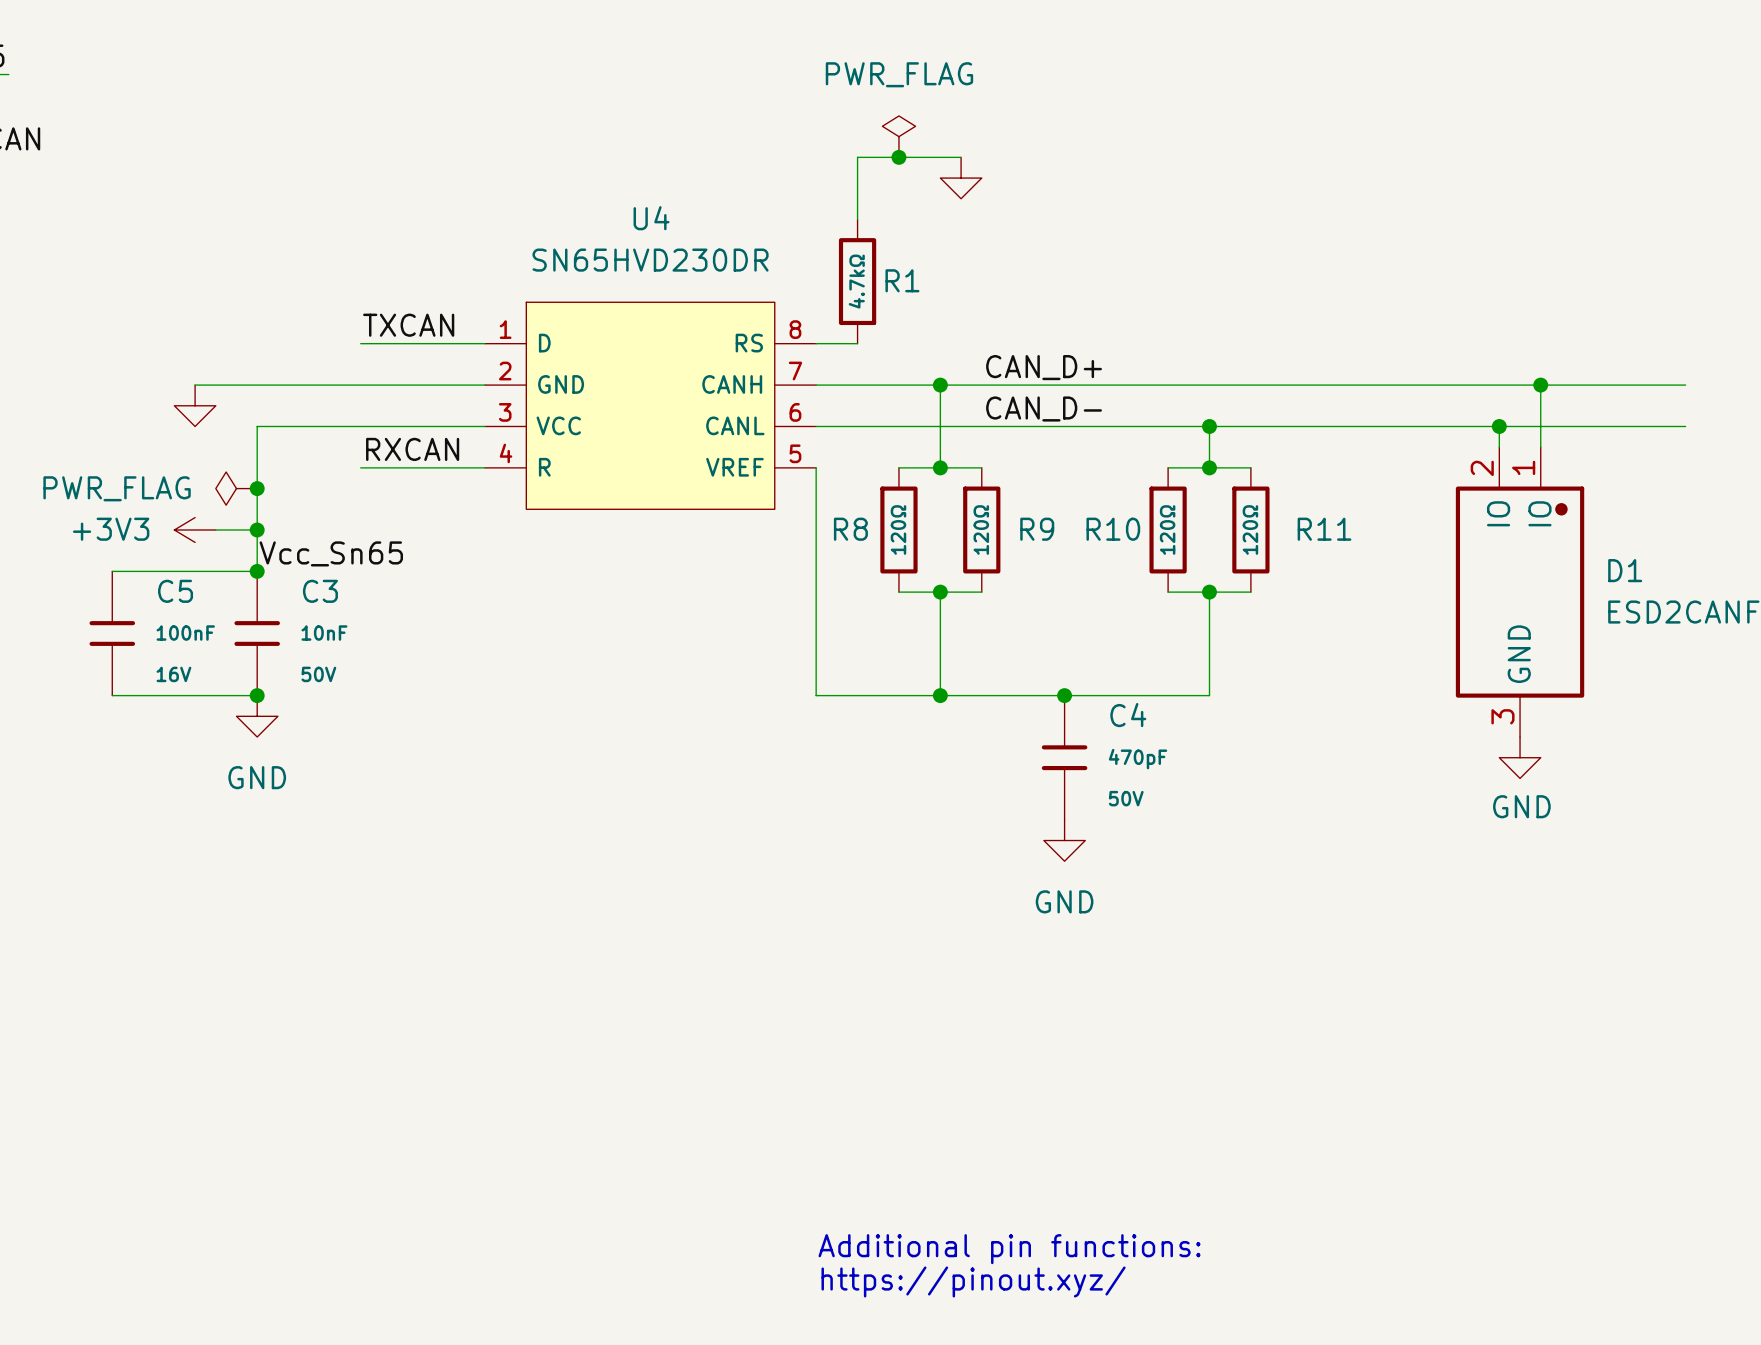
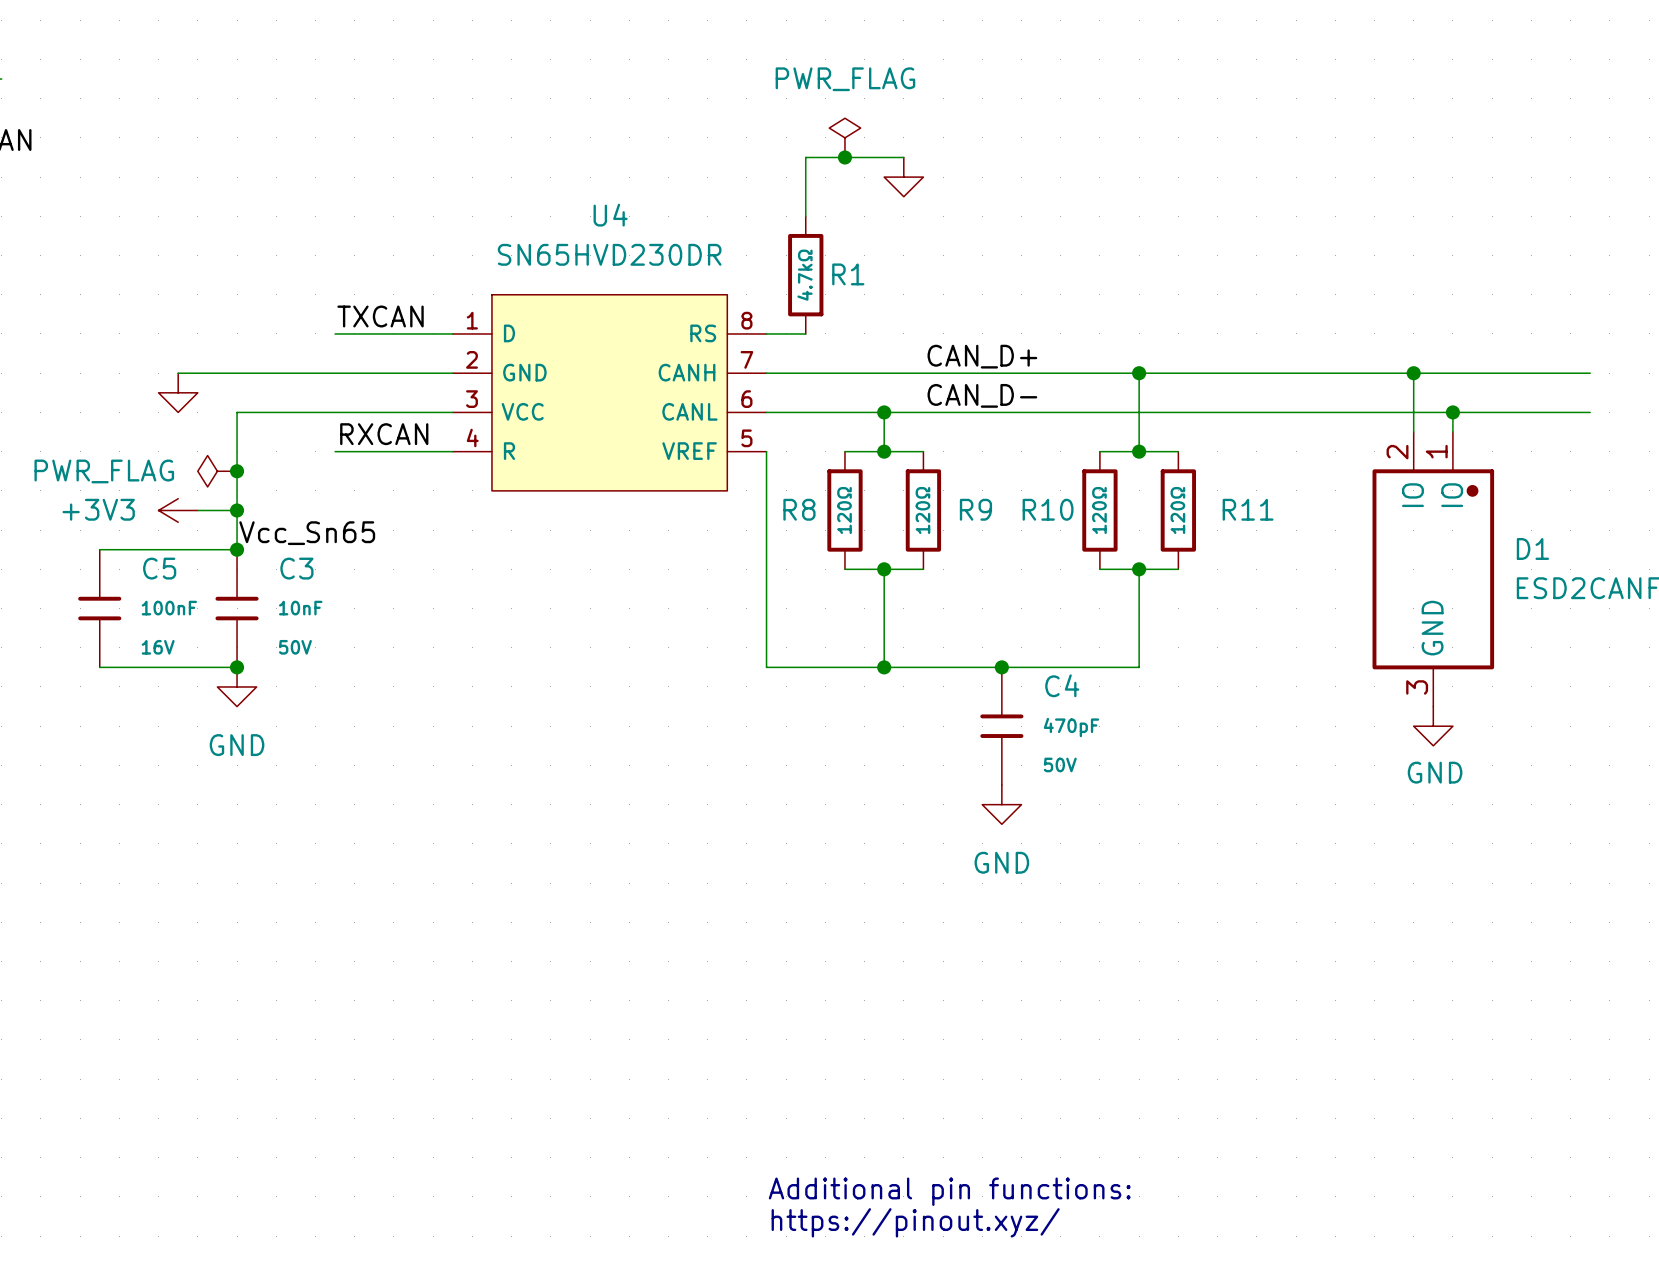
wire: (940, 385) (940, 426) -> (1139, 373) (1139, 412)
junction position: (940, 385) -> (884, 412)
junction: none -> (1413, 373)
wire: (1540, 385) (1540, 426) -> (1413, 373) (1413, 412)
junction: (1540, 385) -> none
junction position: (1209, 426) -> (1139, 373)
junction: (1499, 426) -> none
junction: none -> (1452, 412)

